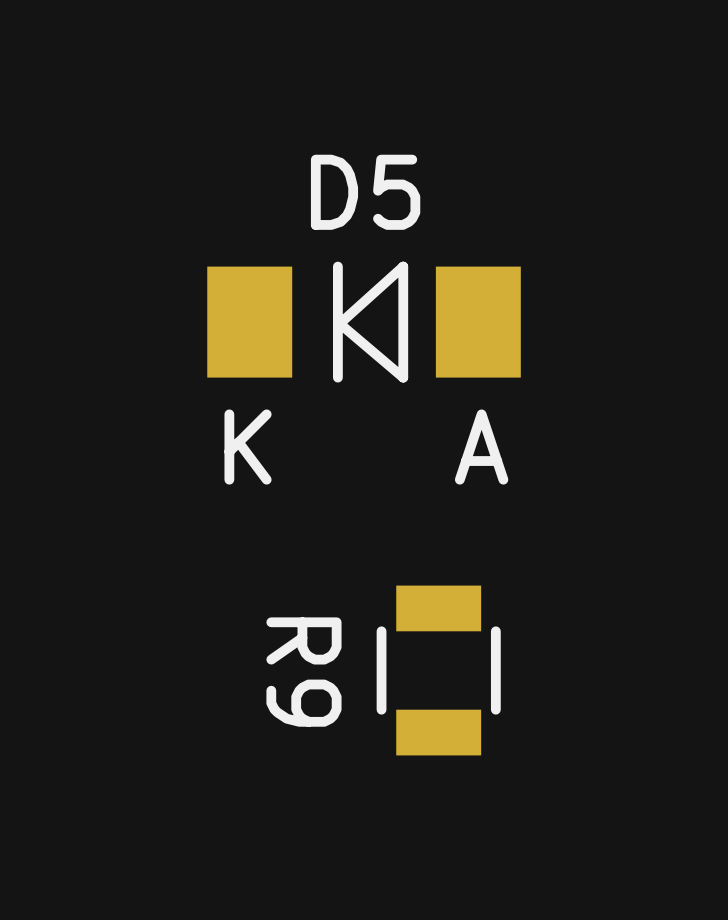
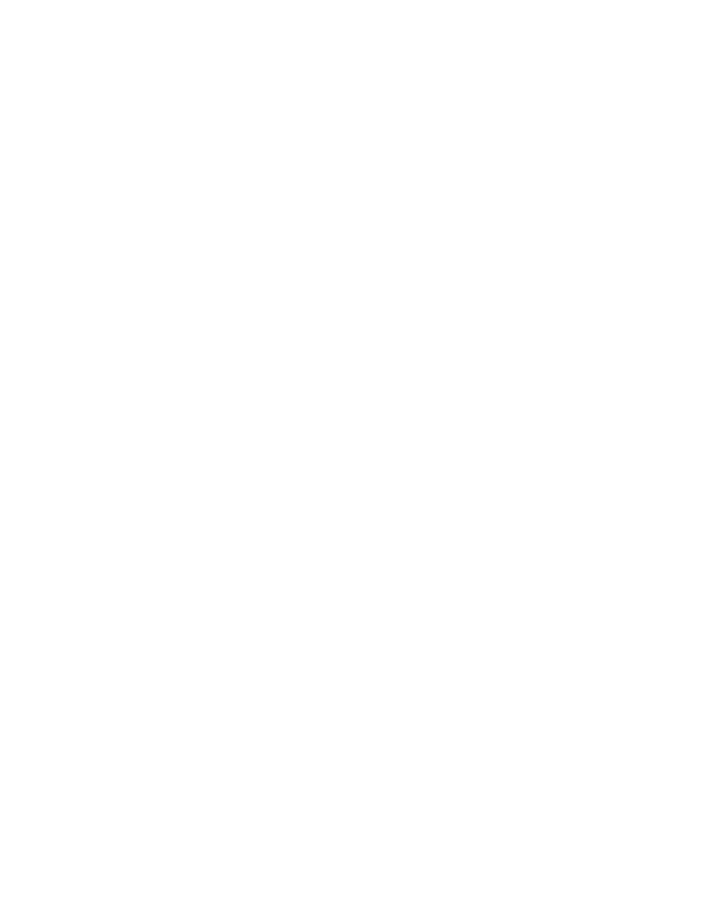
D5: (364, 322) -> none
R9: (438, 670) -> none

